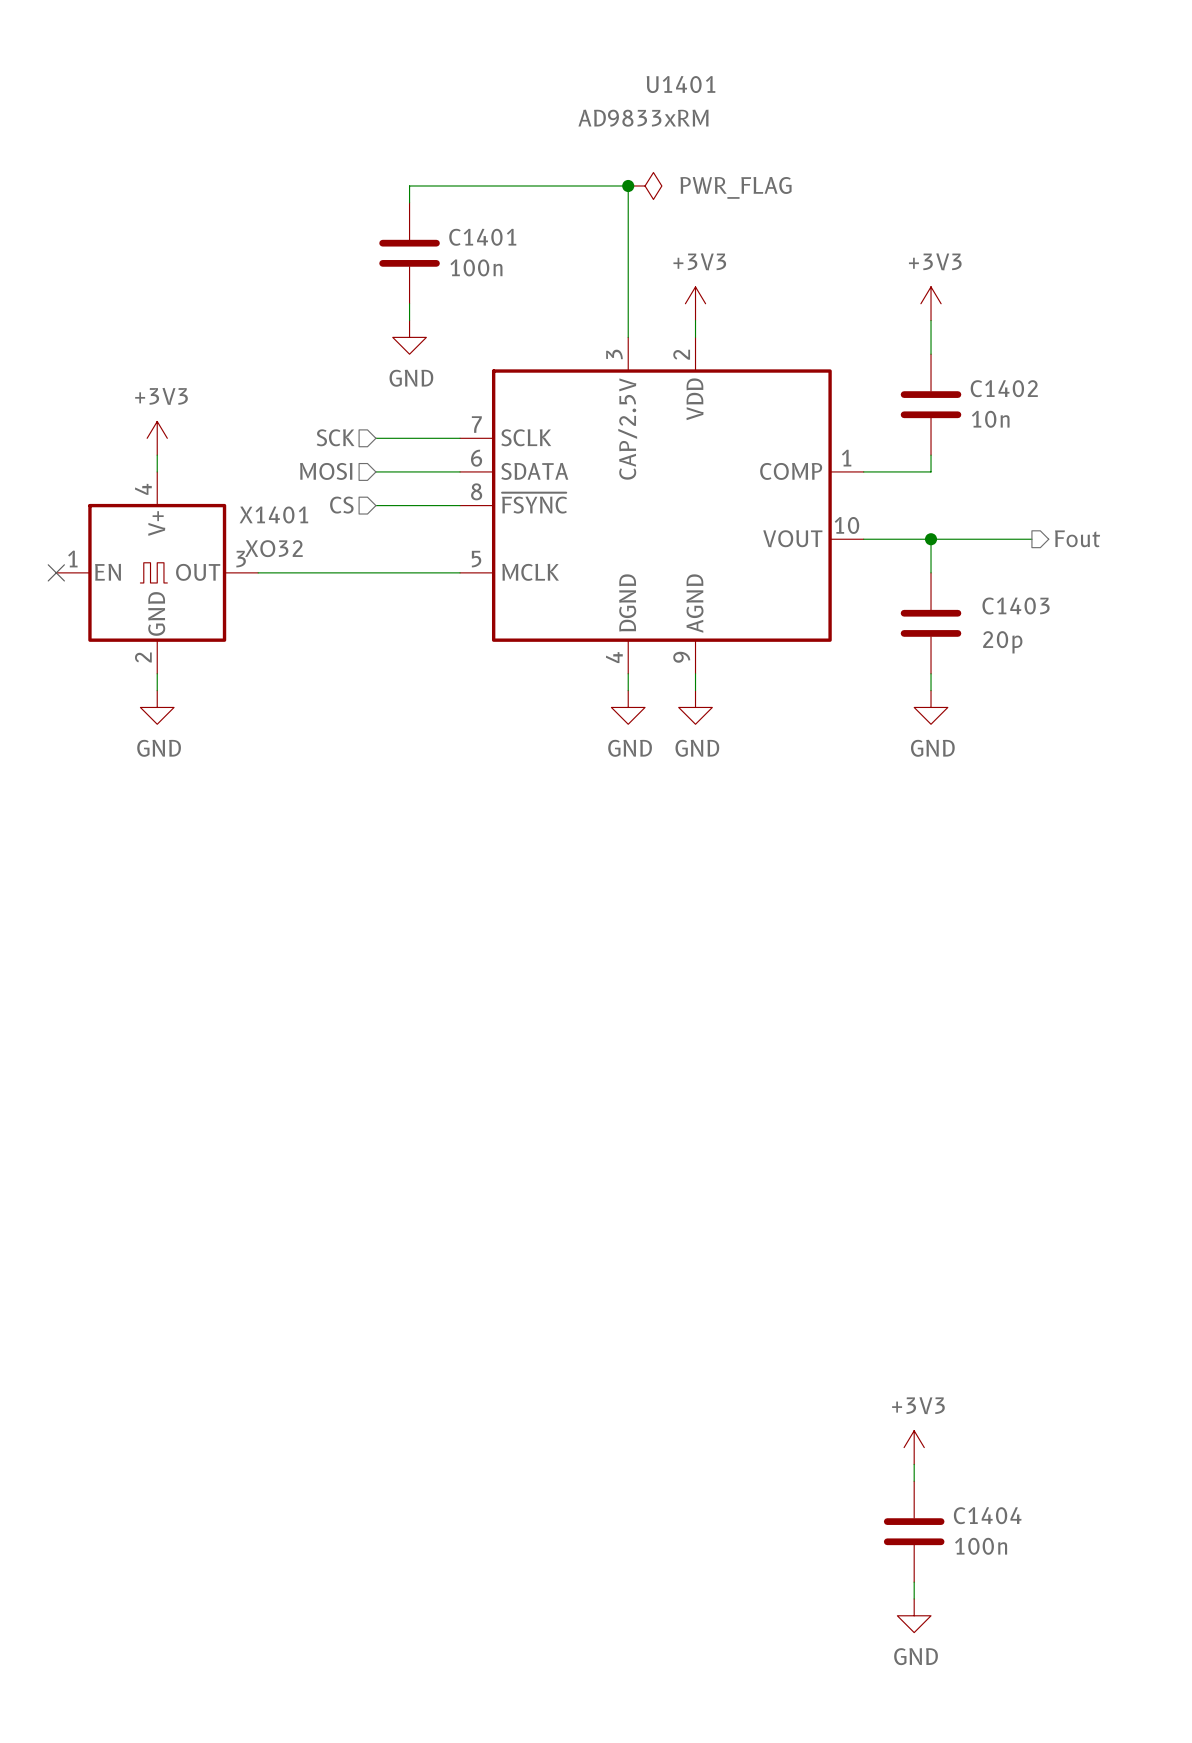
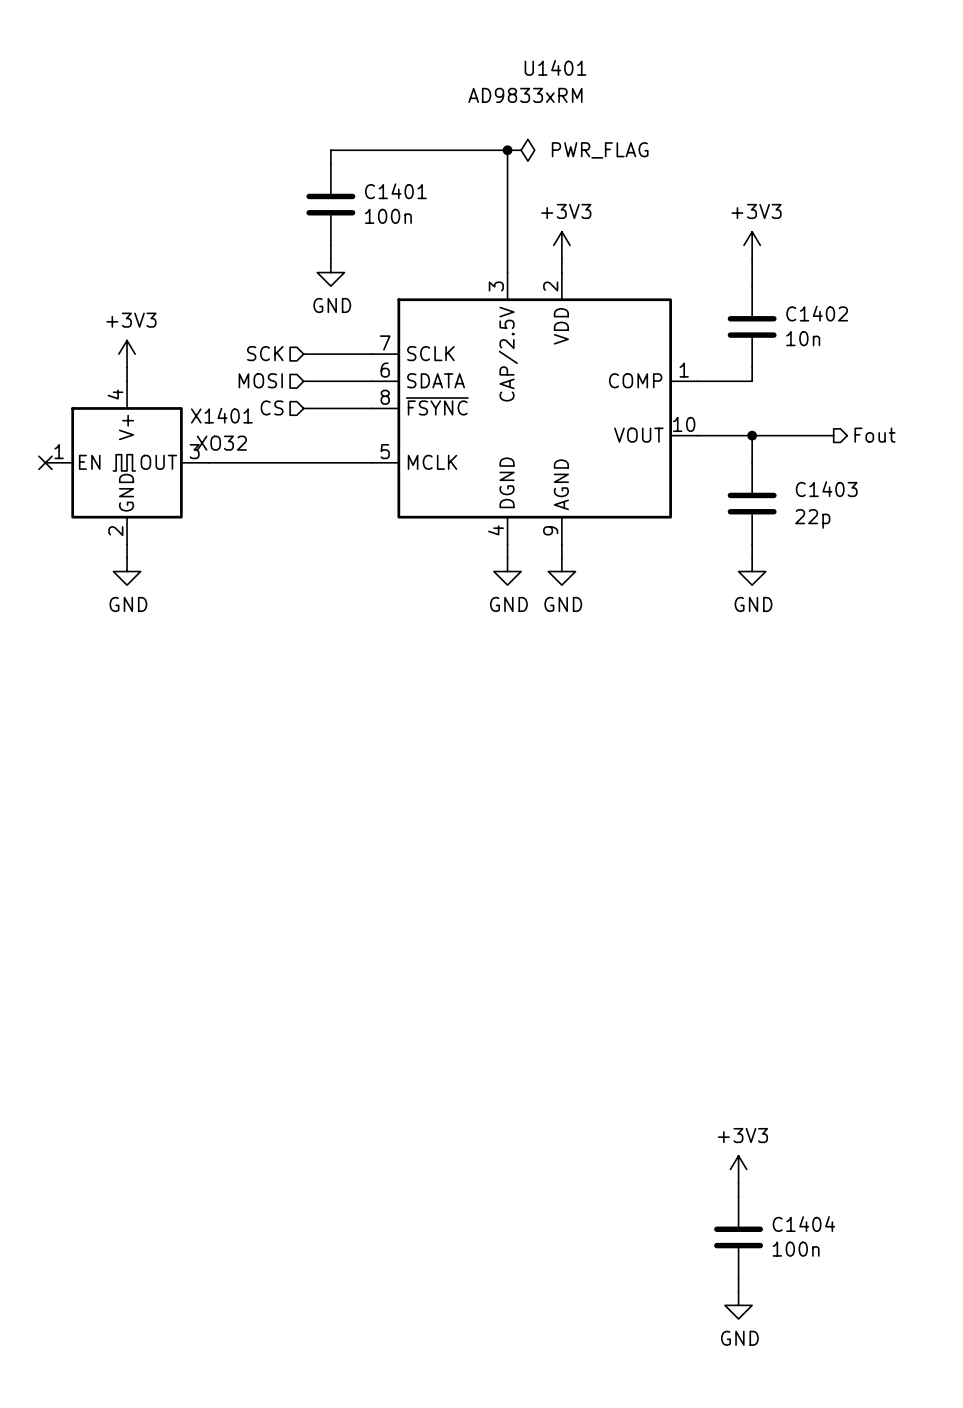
C1403 value: 20p (1002, 642) -> 22p (812, 518)

